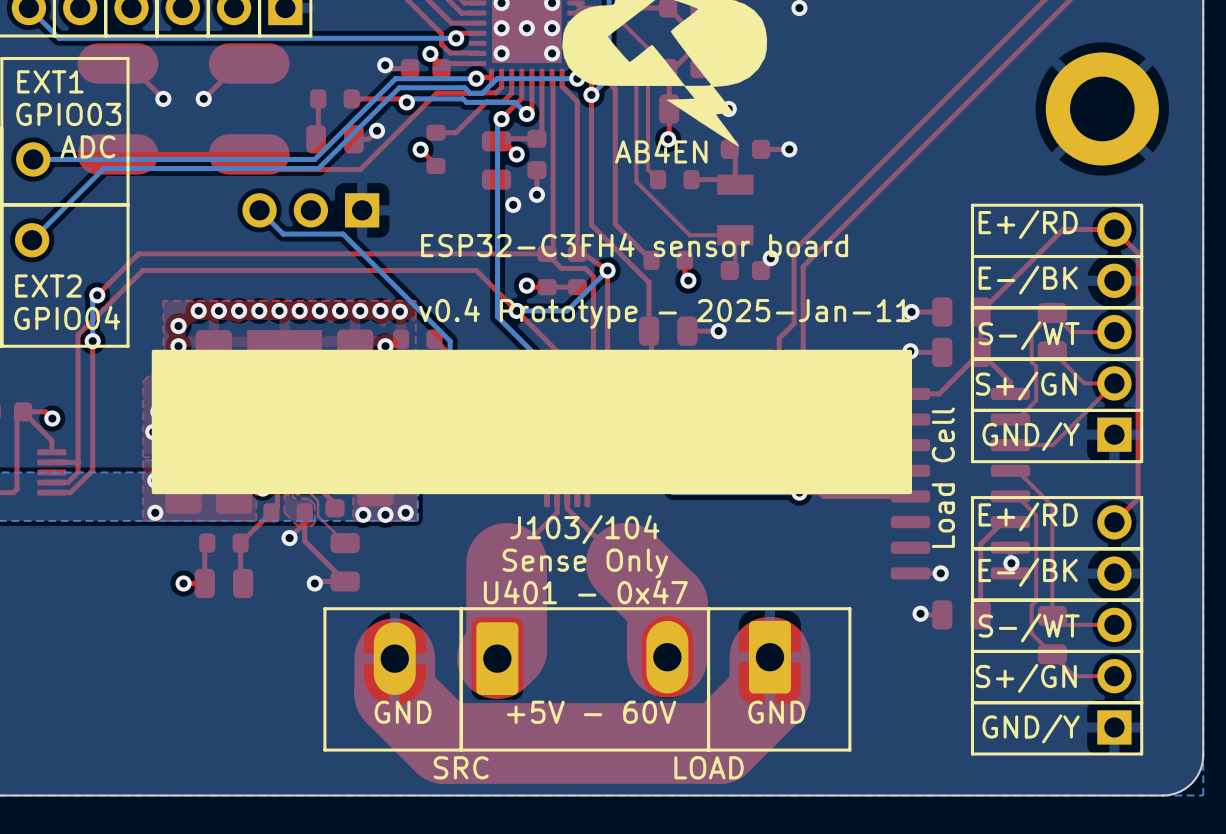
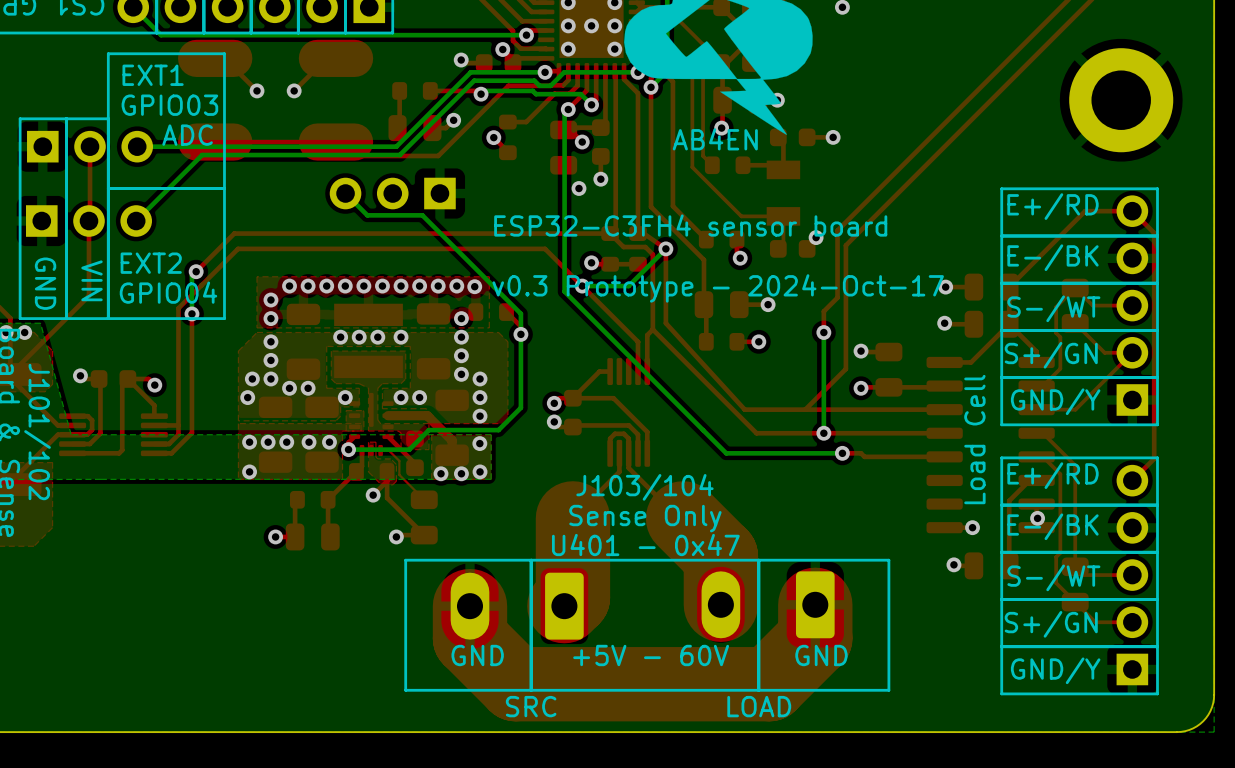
text: v0.4 Prototype - 2025-Jan-11 (664, 313) -> v0.3 Prototype - 2024-Oct-17 (718, 288)
drawing: [151, 349, 913, 495] -> none

